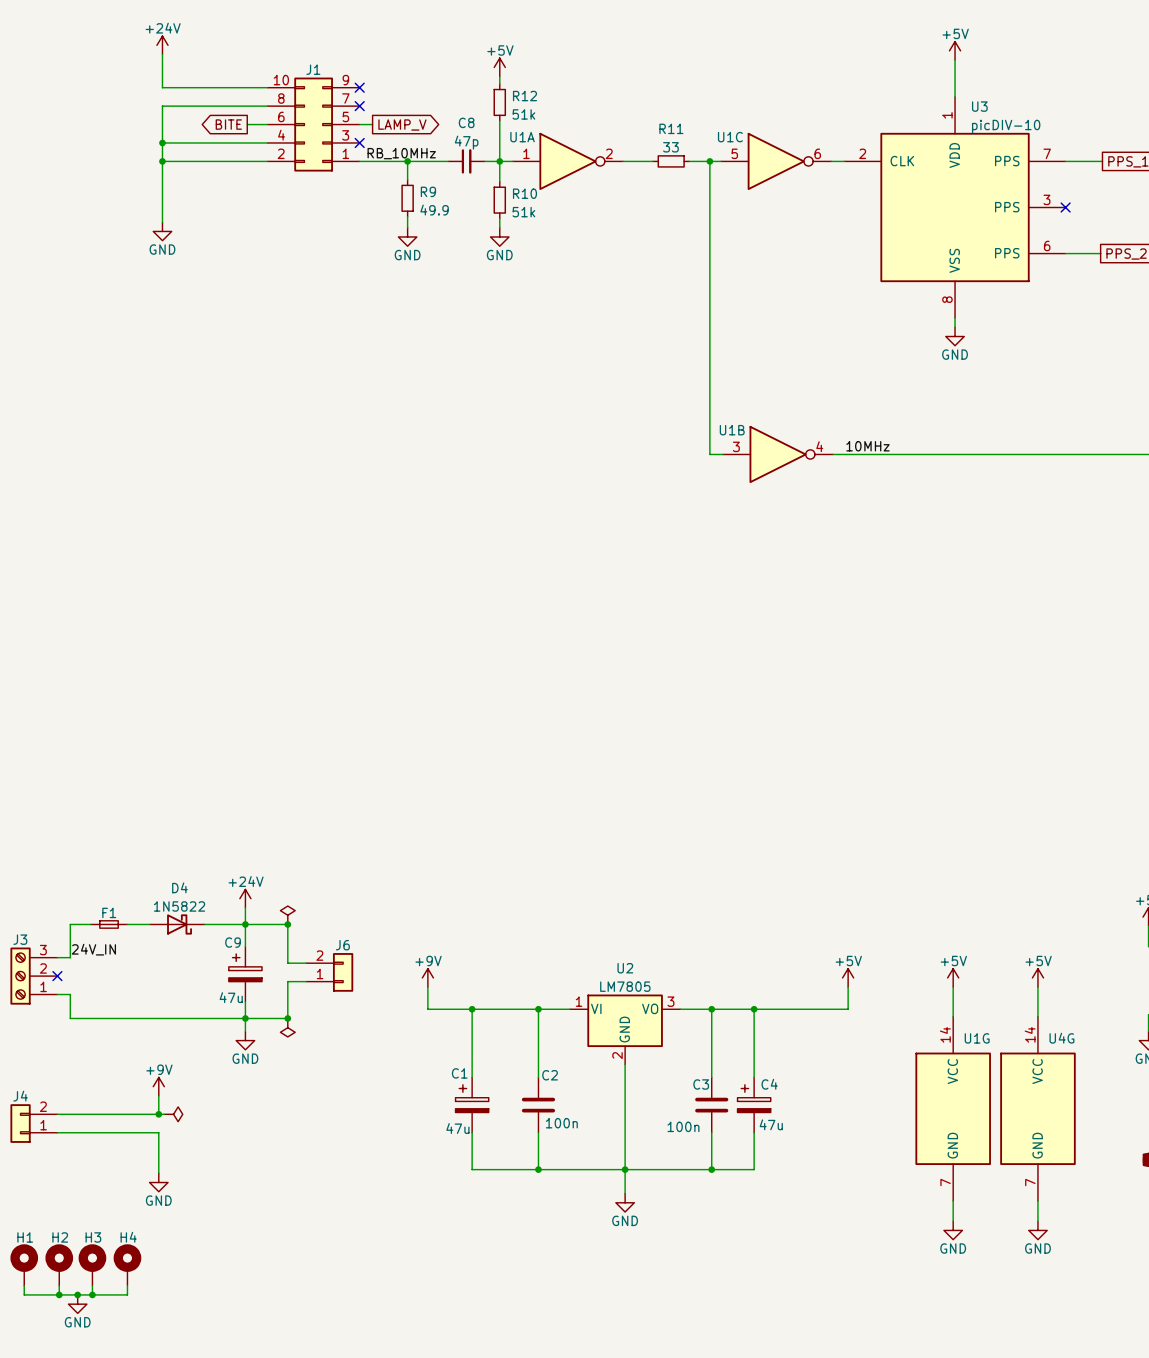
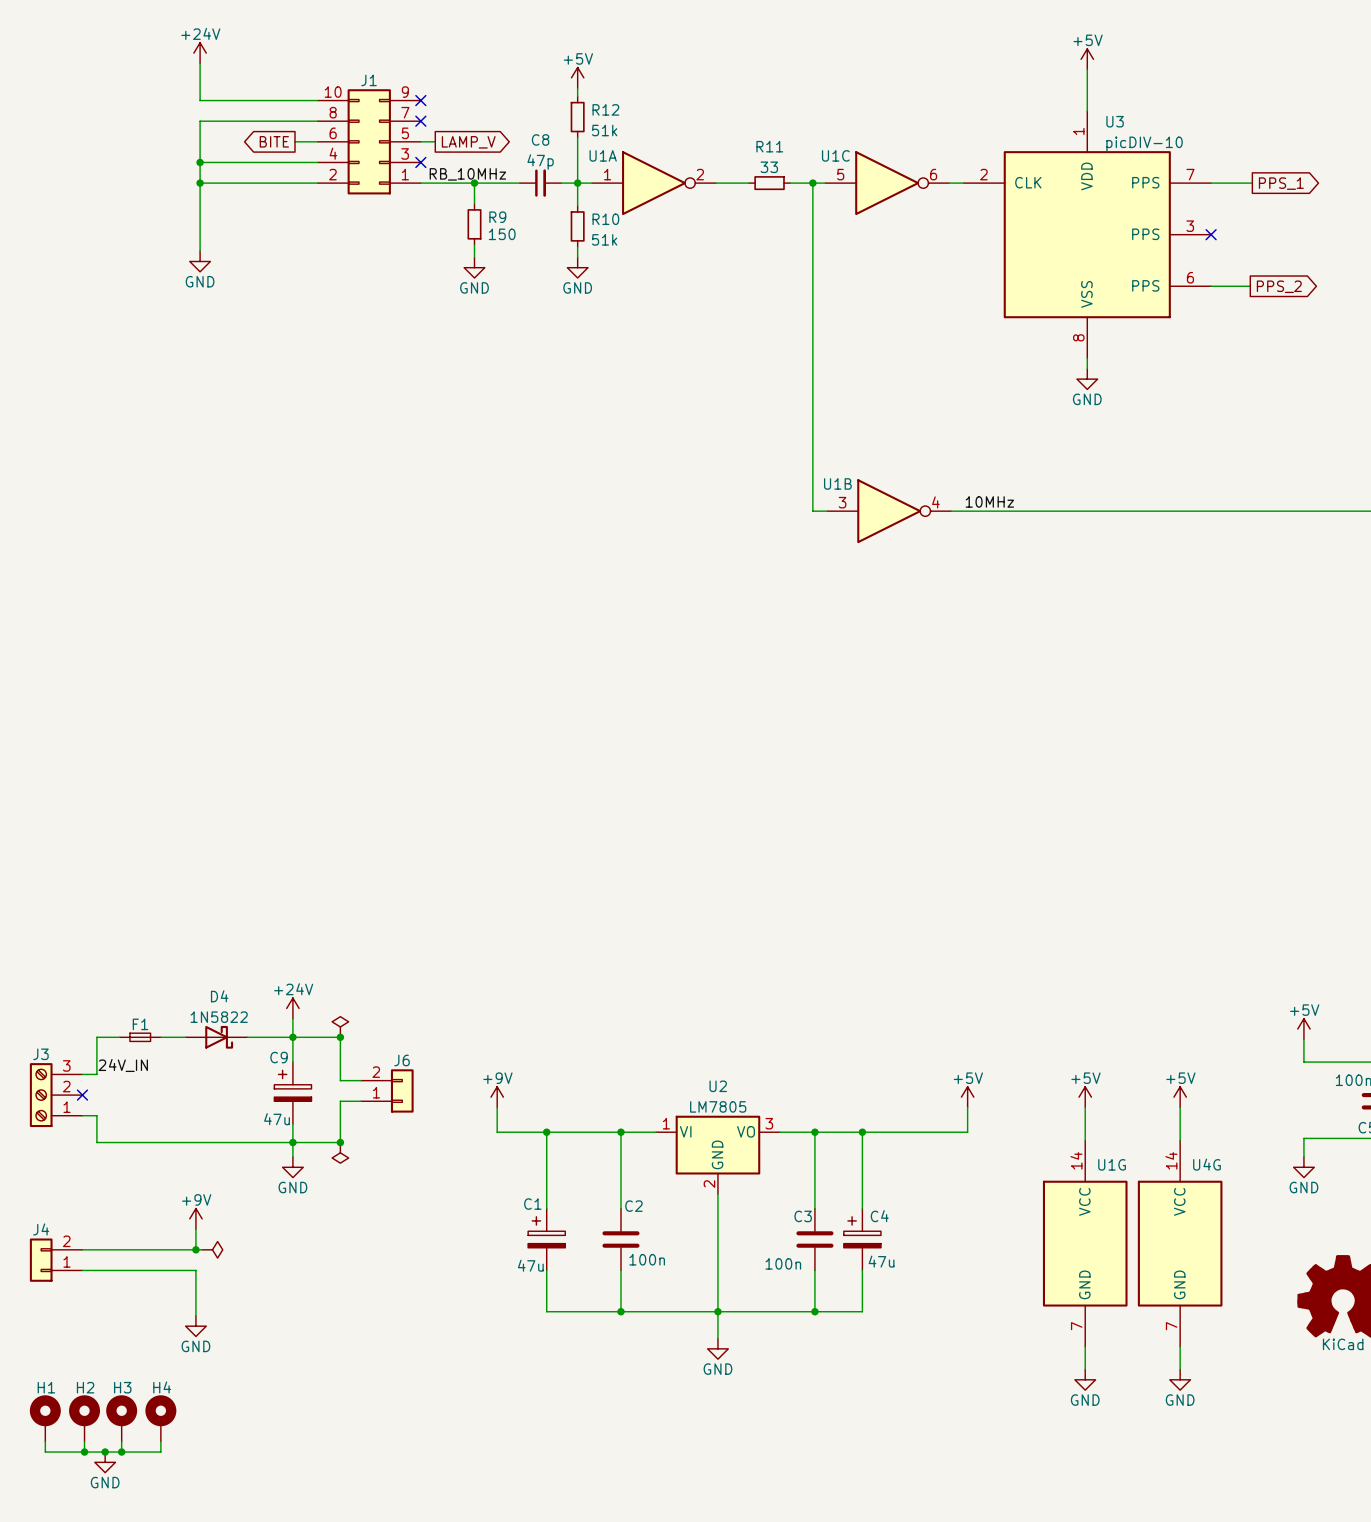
R9 value: 49.9 (434, 210) -> 150 (502, 234)

